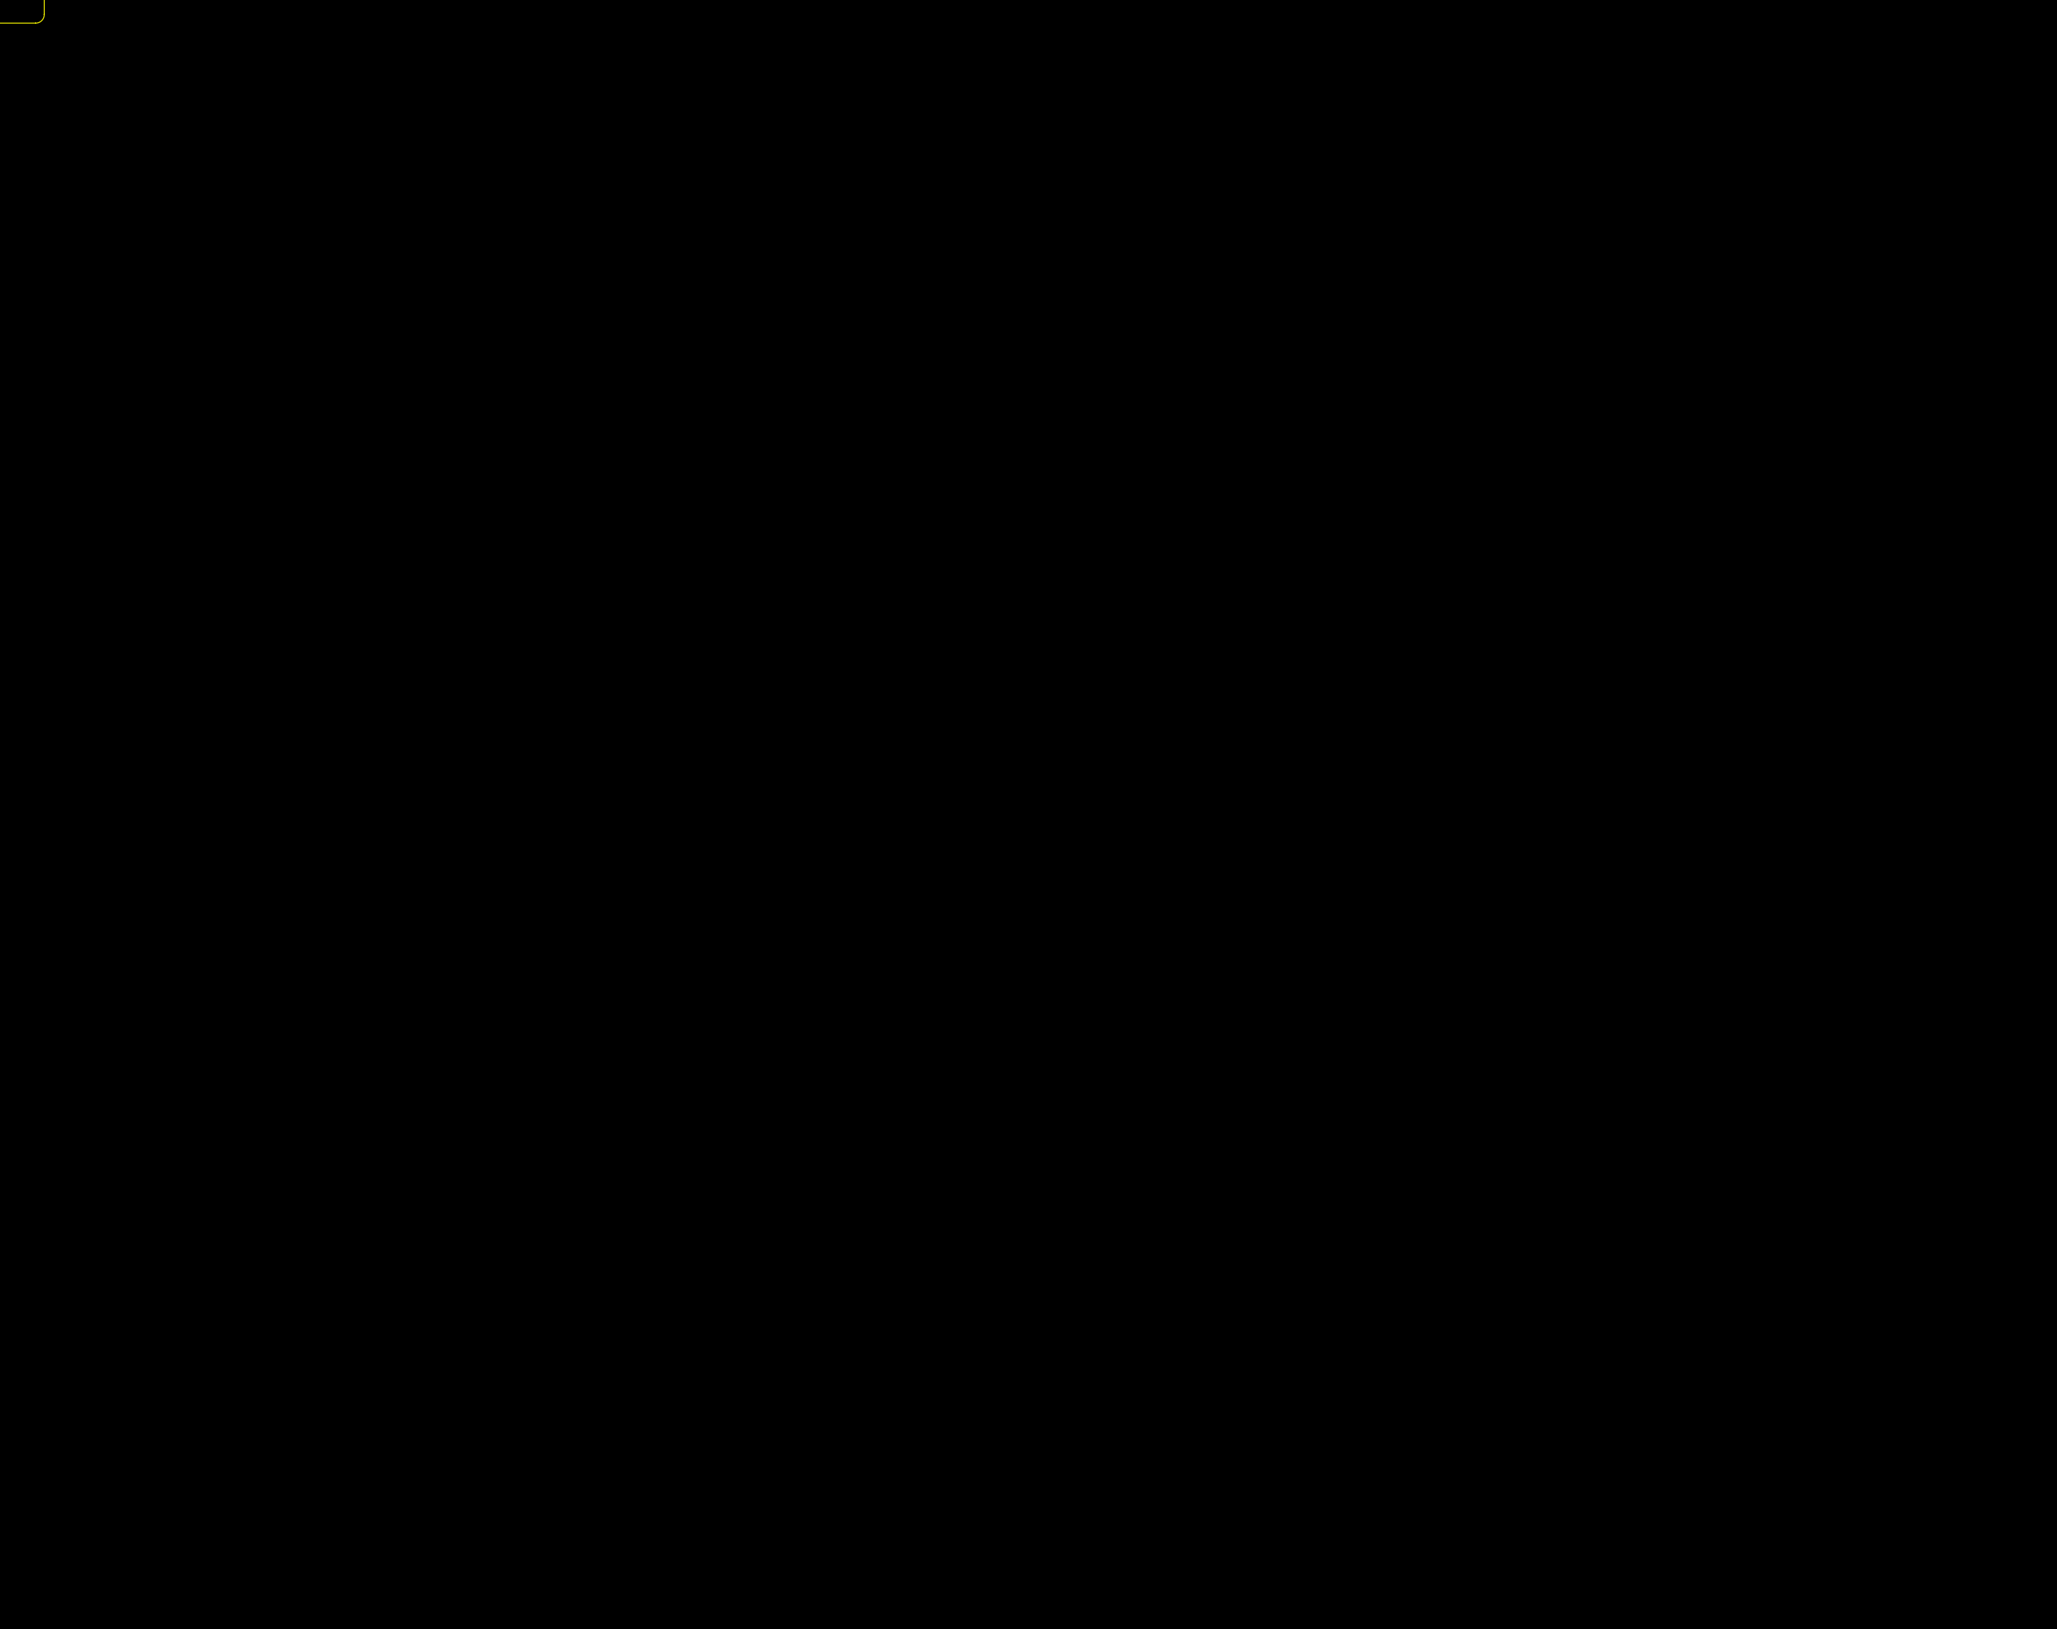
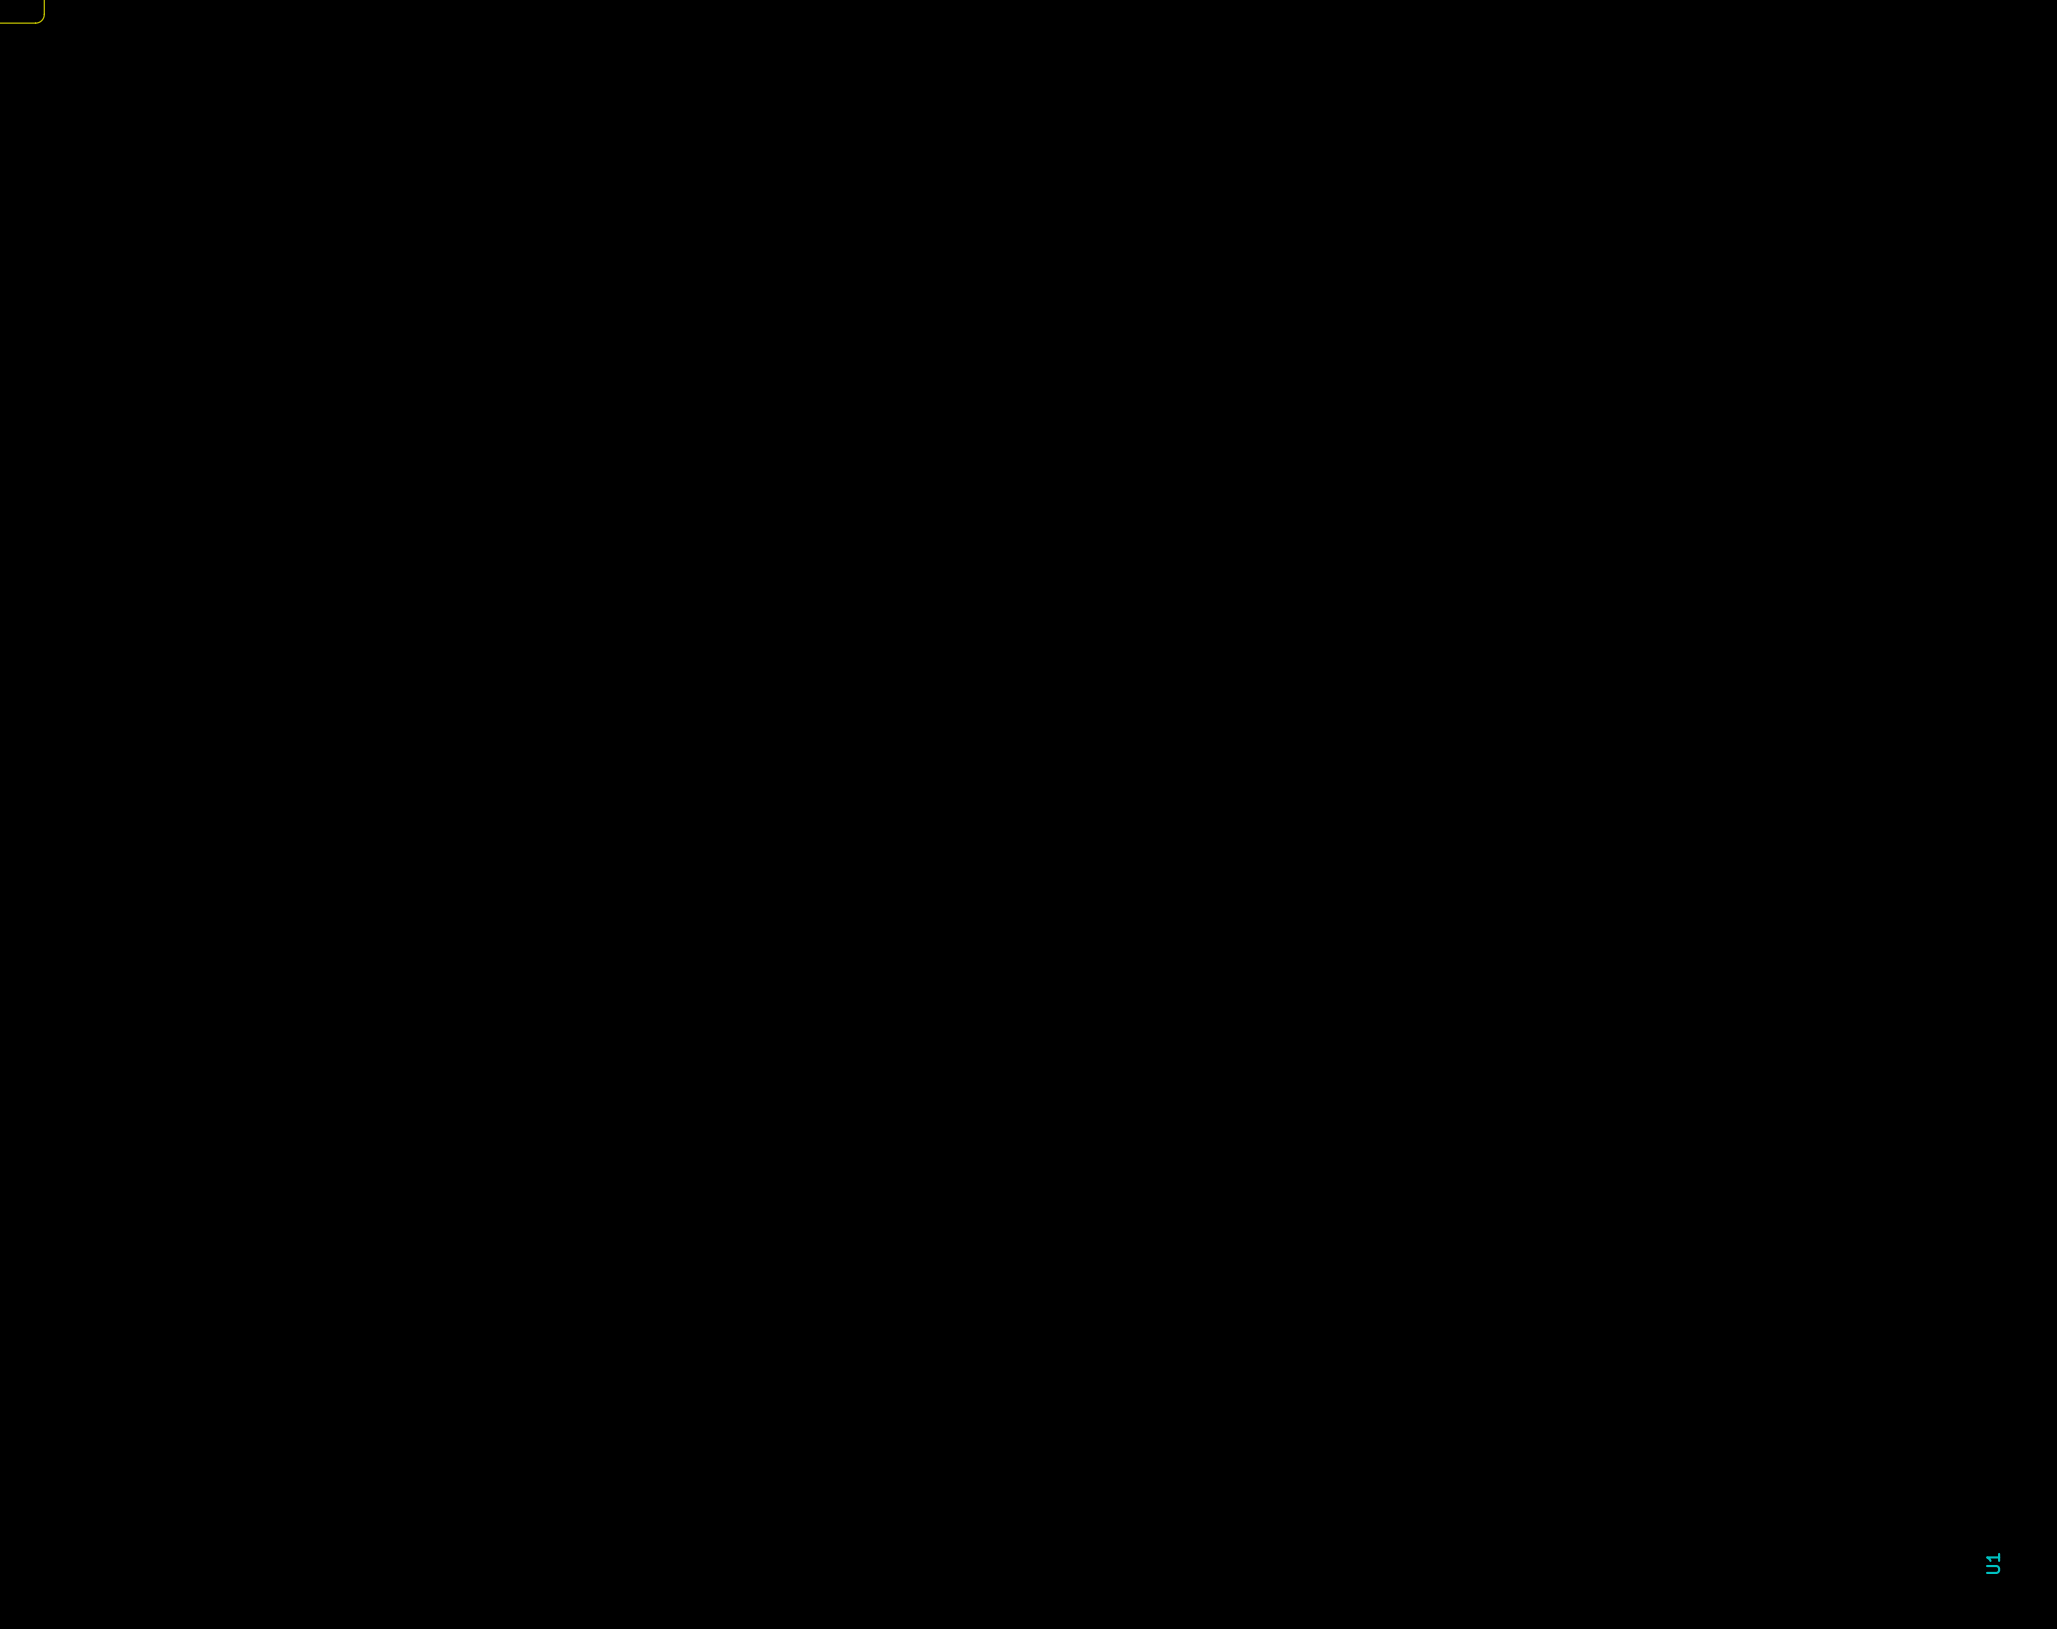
drawing: none -> [1985, 1552, 2001, 1575]

